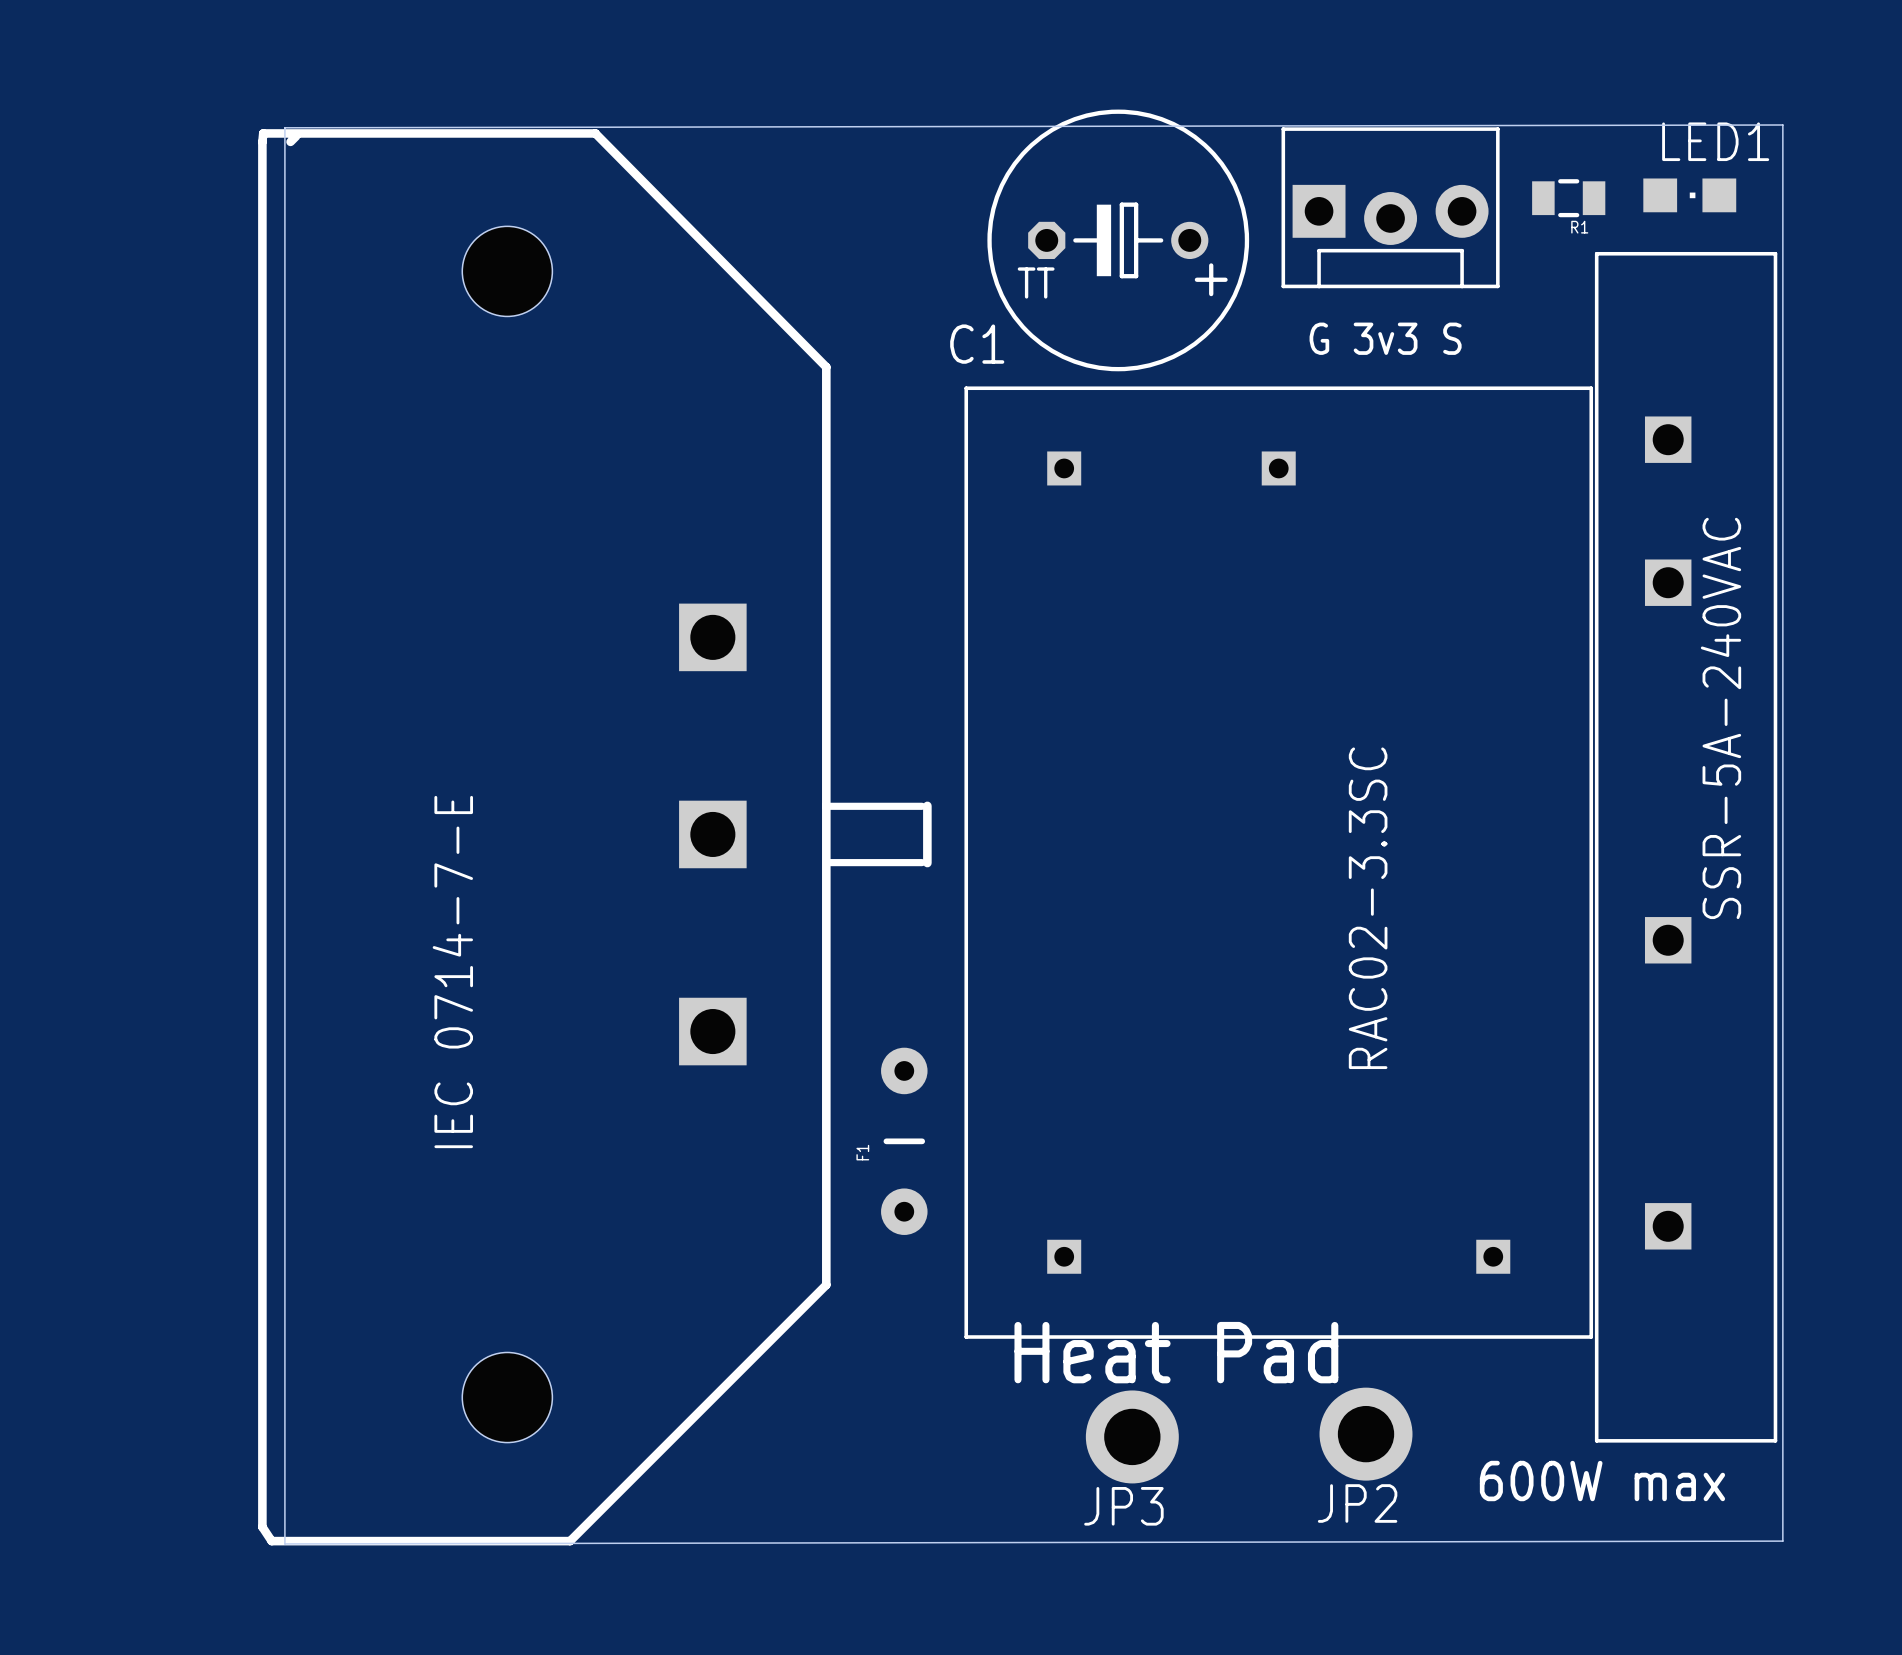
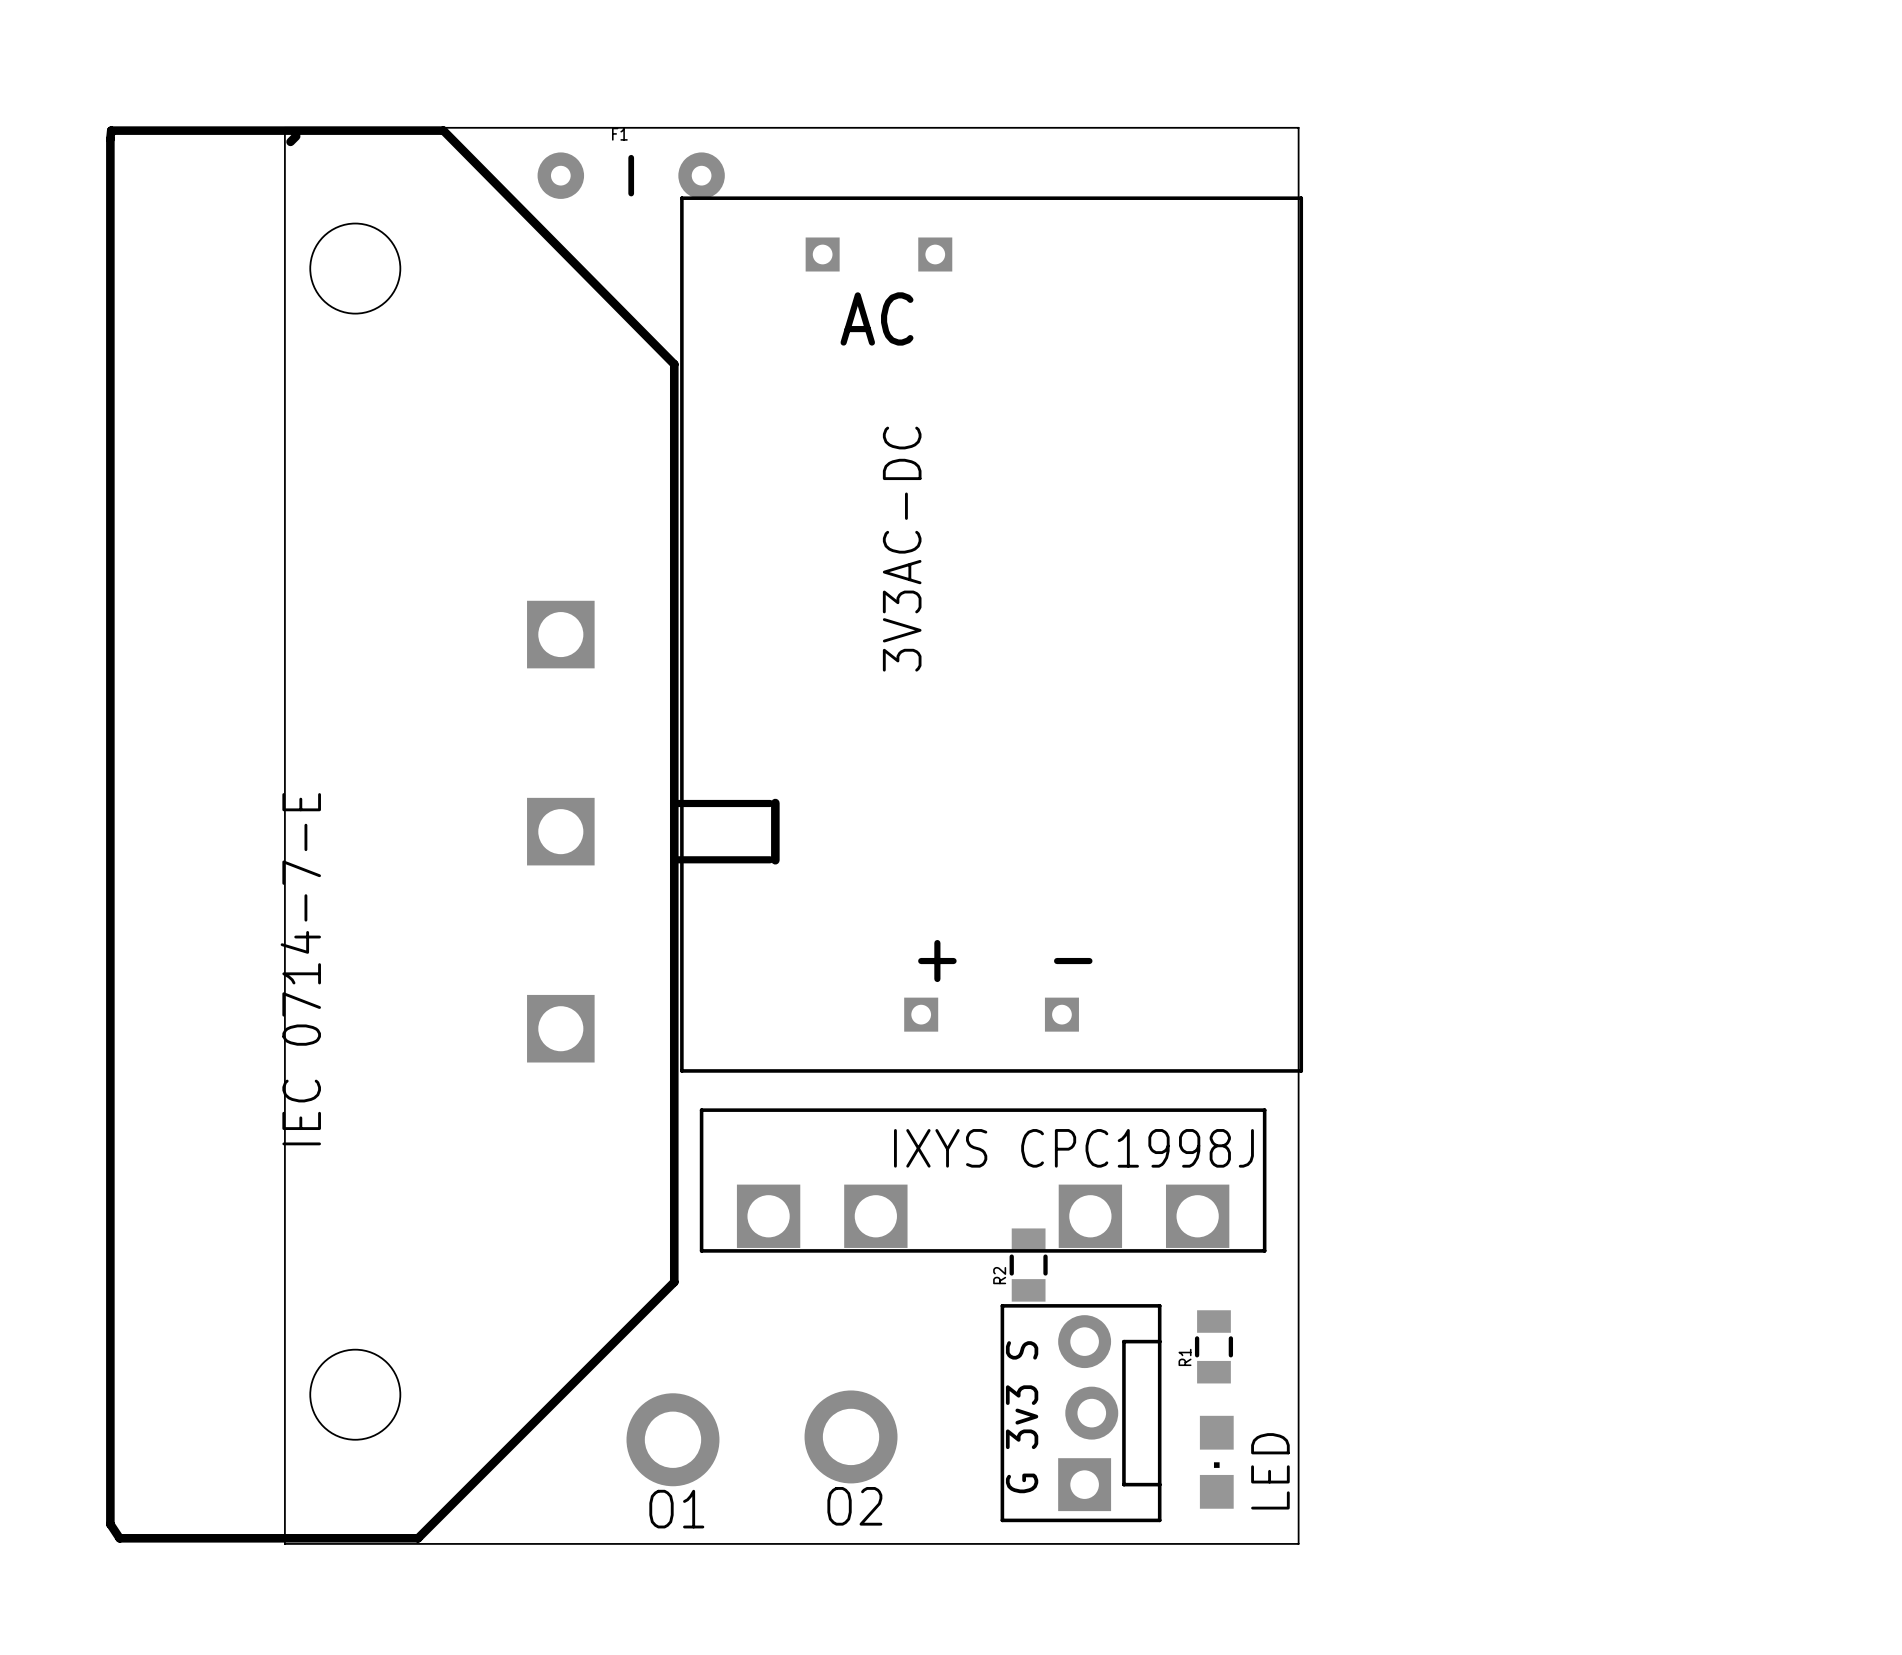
board edge: (284, 127) (1782, 124) (1782, 1541) (284, 1543) -> (284, 127) (1298, 127) (1298, 1543) (284, 1543)
LED1: (1689, 195) -> none
R1 rotation: 0° (1568, 198) -> 90° clockwise (1213, 1346)
R1 position: (1568, 198) -> (1213, 1346)
part: (1390, 207) -> none
C1: (1118, 240) -> none
text: none -> AC (877, 318)
text: G 3v3 S (1385, 338) -> none
part: none -> 3V3AC-DC (991, 634)
part position: (594, 837) -> (442, 834)
part: SSR-5A-240VAC (1686, 847) -> none
part: RAC02-3.3SC (1278, 862) -> none
text: none -> + (937, 961)
text: none -> - (1073, 961)
F1 rotation: 0° (904, 1141) -> 90° clockwise (631, 175)
F1 position: (904, 1141) -> (631, 175)
part: none -> IXYS CPC1998J (983, 1180)
R2: none -> (1028, 1265)
text: Heat Pad (1176, 1352) -> none
part: none -> (1081, 1413)
text: none -> G 3v3 S (1022, 1417)
JP2: (1366, 1434) -> none
O2: none -> (851, 1436)
JP3: (1132, 1436) -> none
O1: none -> (672, 1439)
LED: none -> (1216, 1462)
text: 600W max (1602, 1481) -> none

